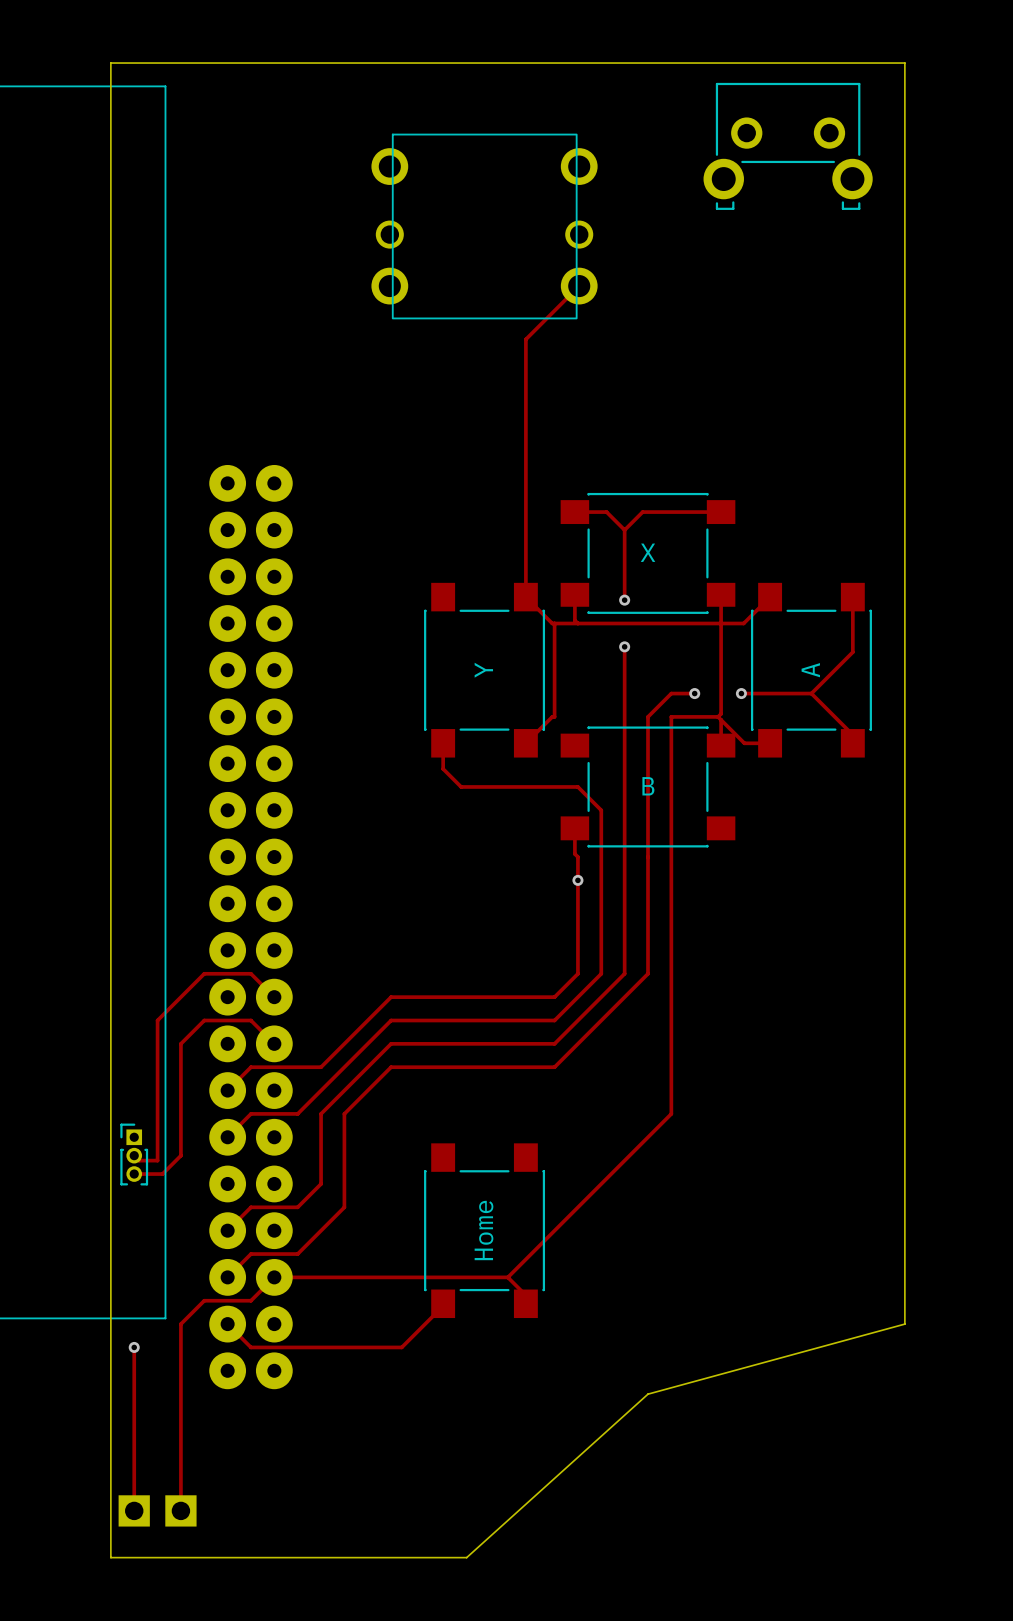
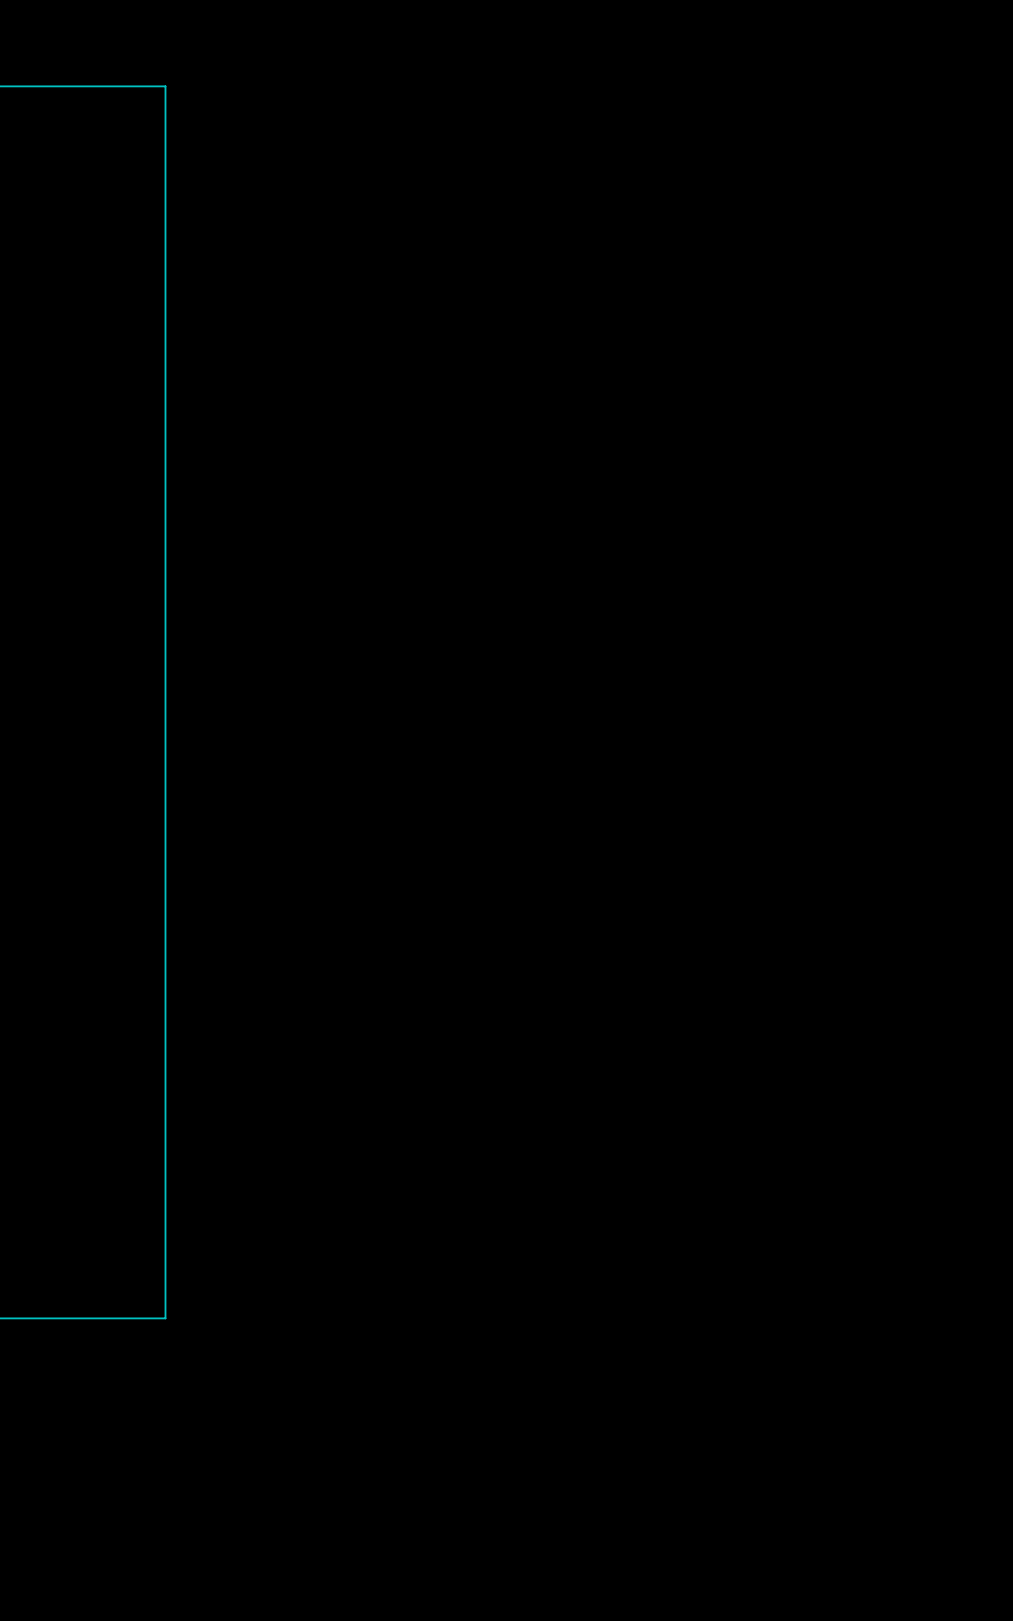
board edge: (110, 63) (110, 1557) (466, 1557) (648, 1394) (904, 1324) (904, 63) (110, 63) -> none
part: (788, 146) -> none
part: (484, 226) -> none
track: (579, 286) (525, 339) (525, 597) (552, 623) (743, 623) (770, 597) -> none
track: (574, 512) (606, 512) (624, 530) -> none
track: (721, 512) (642, 512) (624, 530) -> none
track: (624, 530) (624, 600) -> none
X: (648, 553) -> none
track: (574, 594) (574, 620) (577, 623) -> none
track: (721, 594) (721, 713) (718, 716) -> none
track: (852, 597) (852, 652) (811, 693) -> none
via: (624, 600) -> none
track: (554, 623) (554, 716) (552, 716) (525, 743) -> none
track: (624, 646) (624, 973) (554, 1043) (391, 1043) (321, 1113) (321, 1183) (297, 1207) (250, 1207) (227, 1230) -> none
via: (624, 646) -> none
Y: (484, 670) -> none
A: (811, 670) -> none
track: (694, 693) (671, 693) (648, 716) (648, 973) (554, 1067) (391, 1067) (344, 1113) (344, 1207) (297, 1254) (250, 1254) (227, 1277) -> none
via: (694, 693) -> none
track: (741, 693) (811, 693) -> none
via: (741, 693) -> none
track: (811, 693) (852, 734) (852, 743) -> none
track: (718, 716) (744, 743) (770, 743) -> none
track: (718, 716) (671, 716) (671, 1113) (507, 1277) -> none
track: (721, 719) (721, 745) -> none
track: (443, 743) (443, 768) (461, 786) (577, 786) (601, 810) (601, 973) (554, 1020) (391, 1020) (297, 1113) (250, 1113) (227, 1137) -> none
B: (648, 786) -> none
track: (574, 828) (574, 853) (577, 857) (577, 973) (554, 997) (391, 997) (321, 1067) (250, 1067) (227, 1090) -> none
via: (577, 880) -> none
part: (250, 927) -> none
track: (274, 997) (250, 973) (204, 973) (157, 1020) (157, 1160) (139, 1160) (134, 1155) -> none
track: (274, 1043) (250, 1020) (204, 1020) (180, 1043) (180, 1155) (162, 1174) (134, 1174) -> none
part: (134, 1154) -> none
Home: (484, 1230) -> none
track: (507, 1277) (274, 1277) (250, 1300) (204, 1300) (180, 1324) (180, 1510) -> none
track: (507, 1277) (531, 1300) -> none
track: (448, 1300) (401, 1347) (250, 1347) (227, 1324) -> none
track: (134, 1347) (134, 1510) -> none
via: (134, 1347) -> none
part: (134, 1510) -> none
part: (180, 1510) -> none

